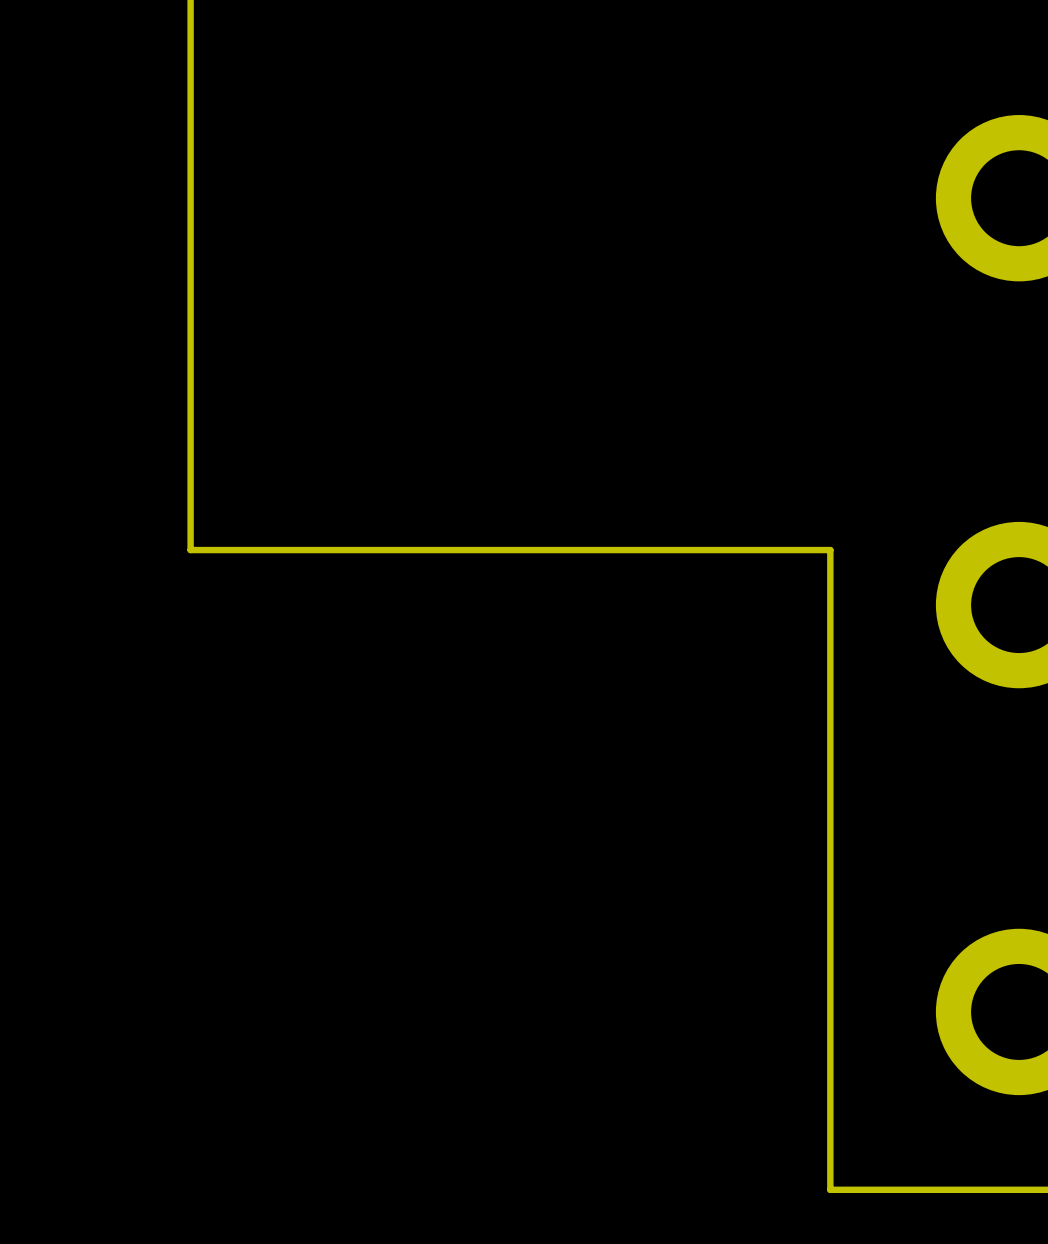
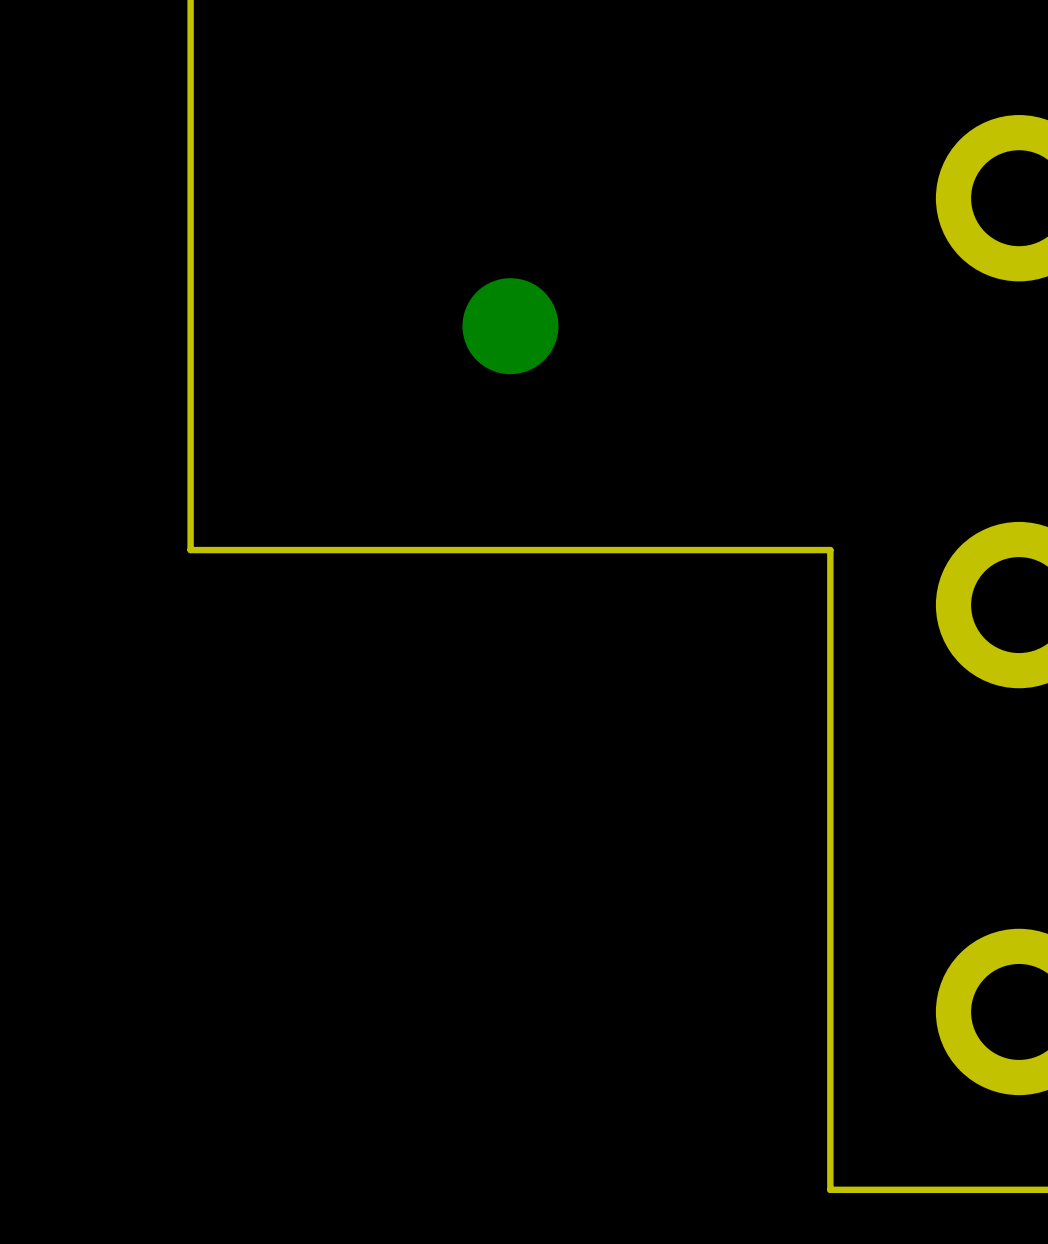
part: none -> (510, 326)

